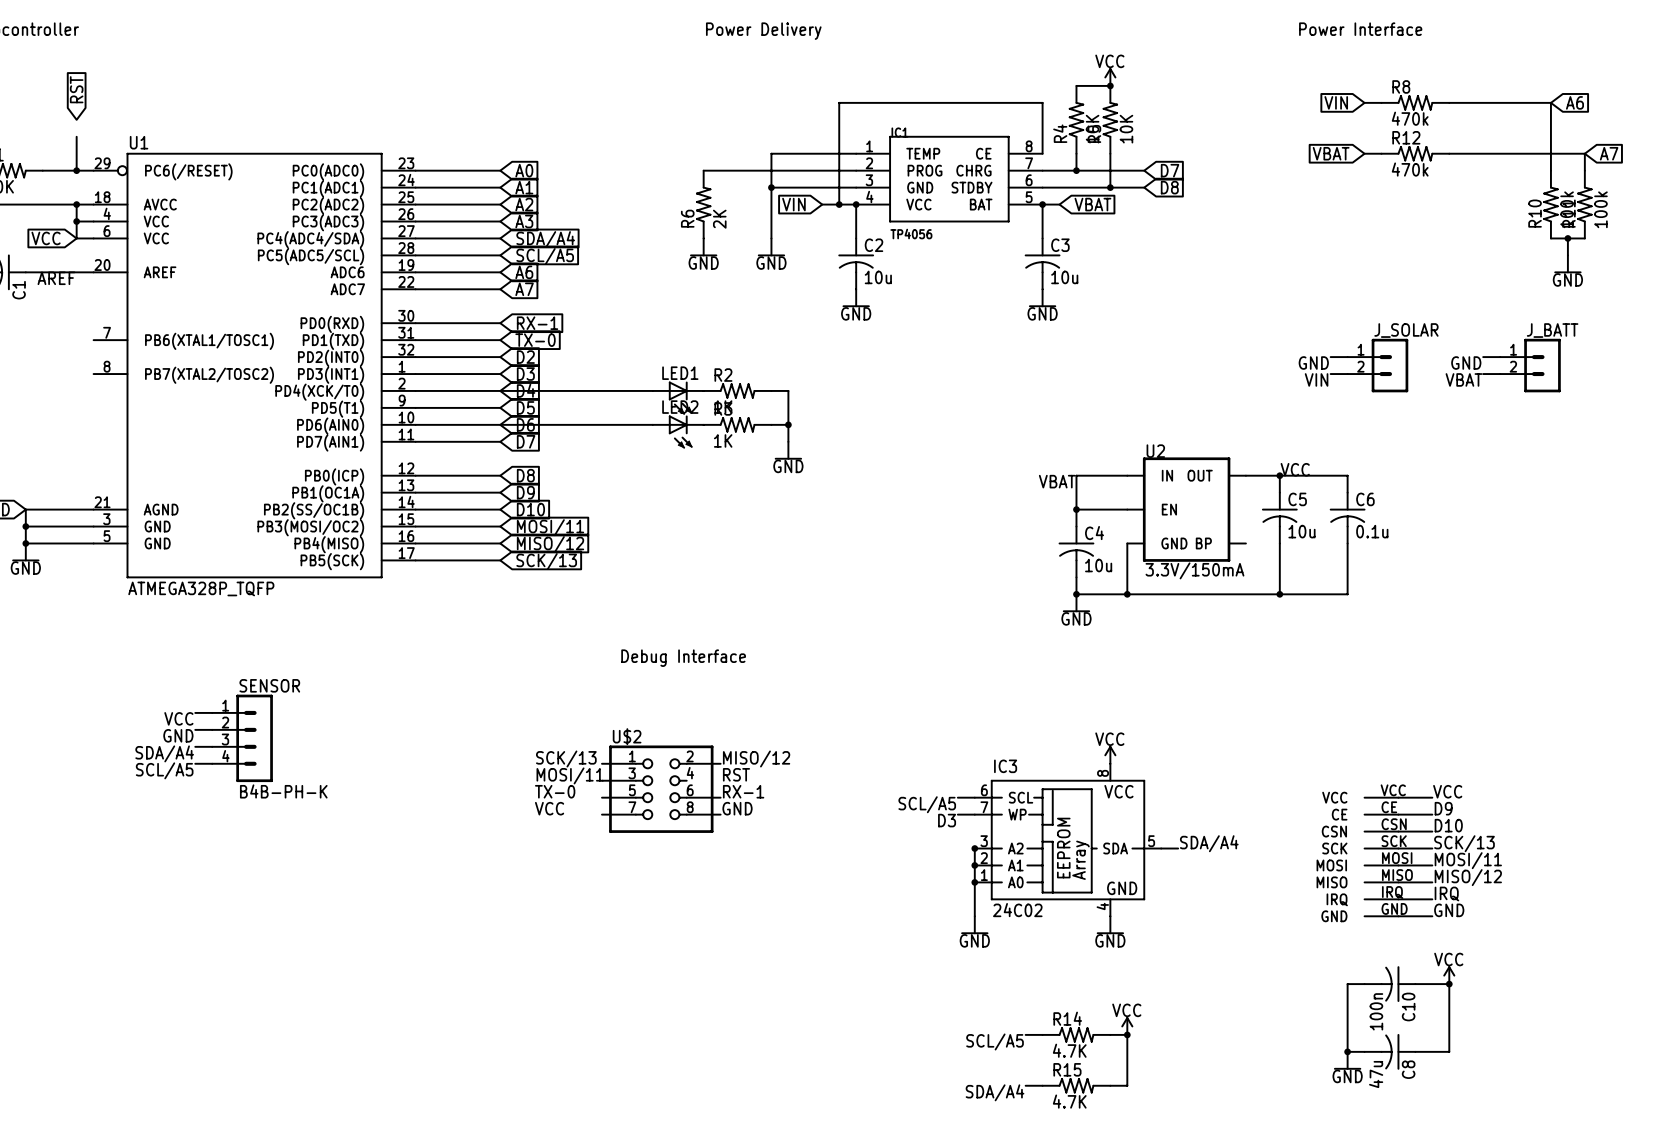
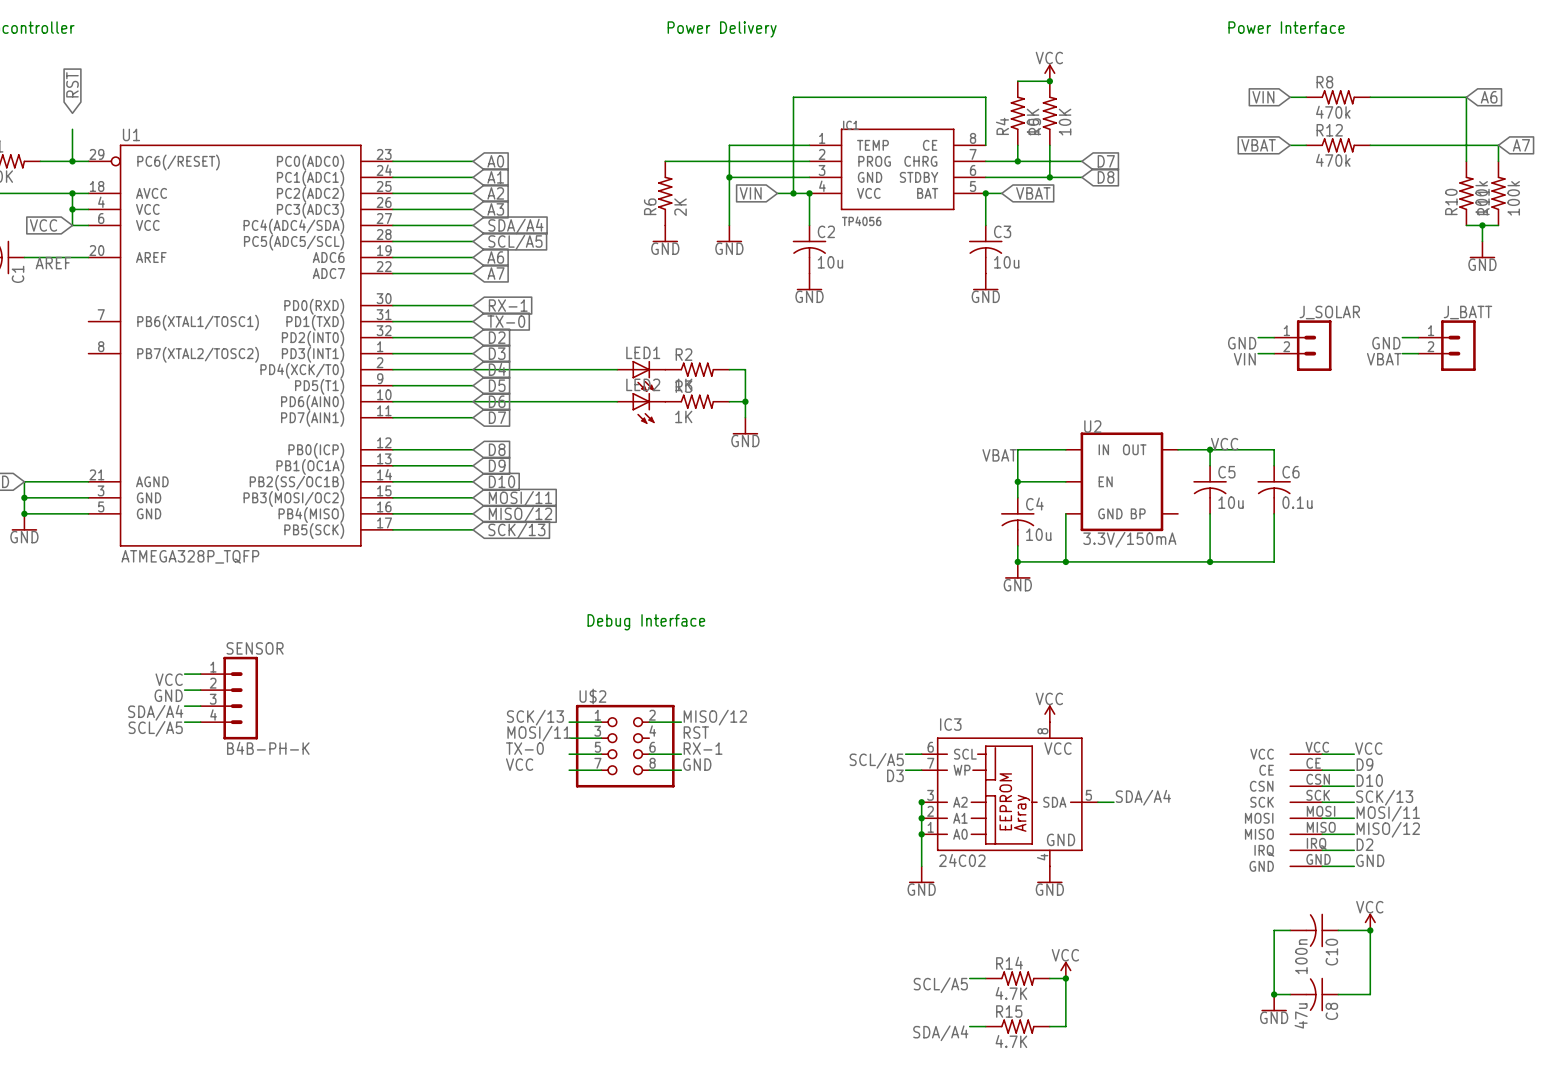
label: IRQ (1446, 893) -> D2 (1364, 844)

